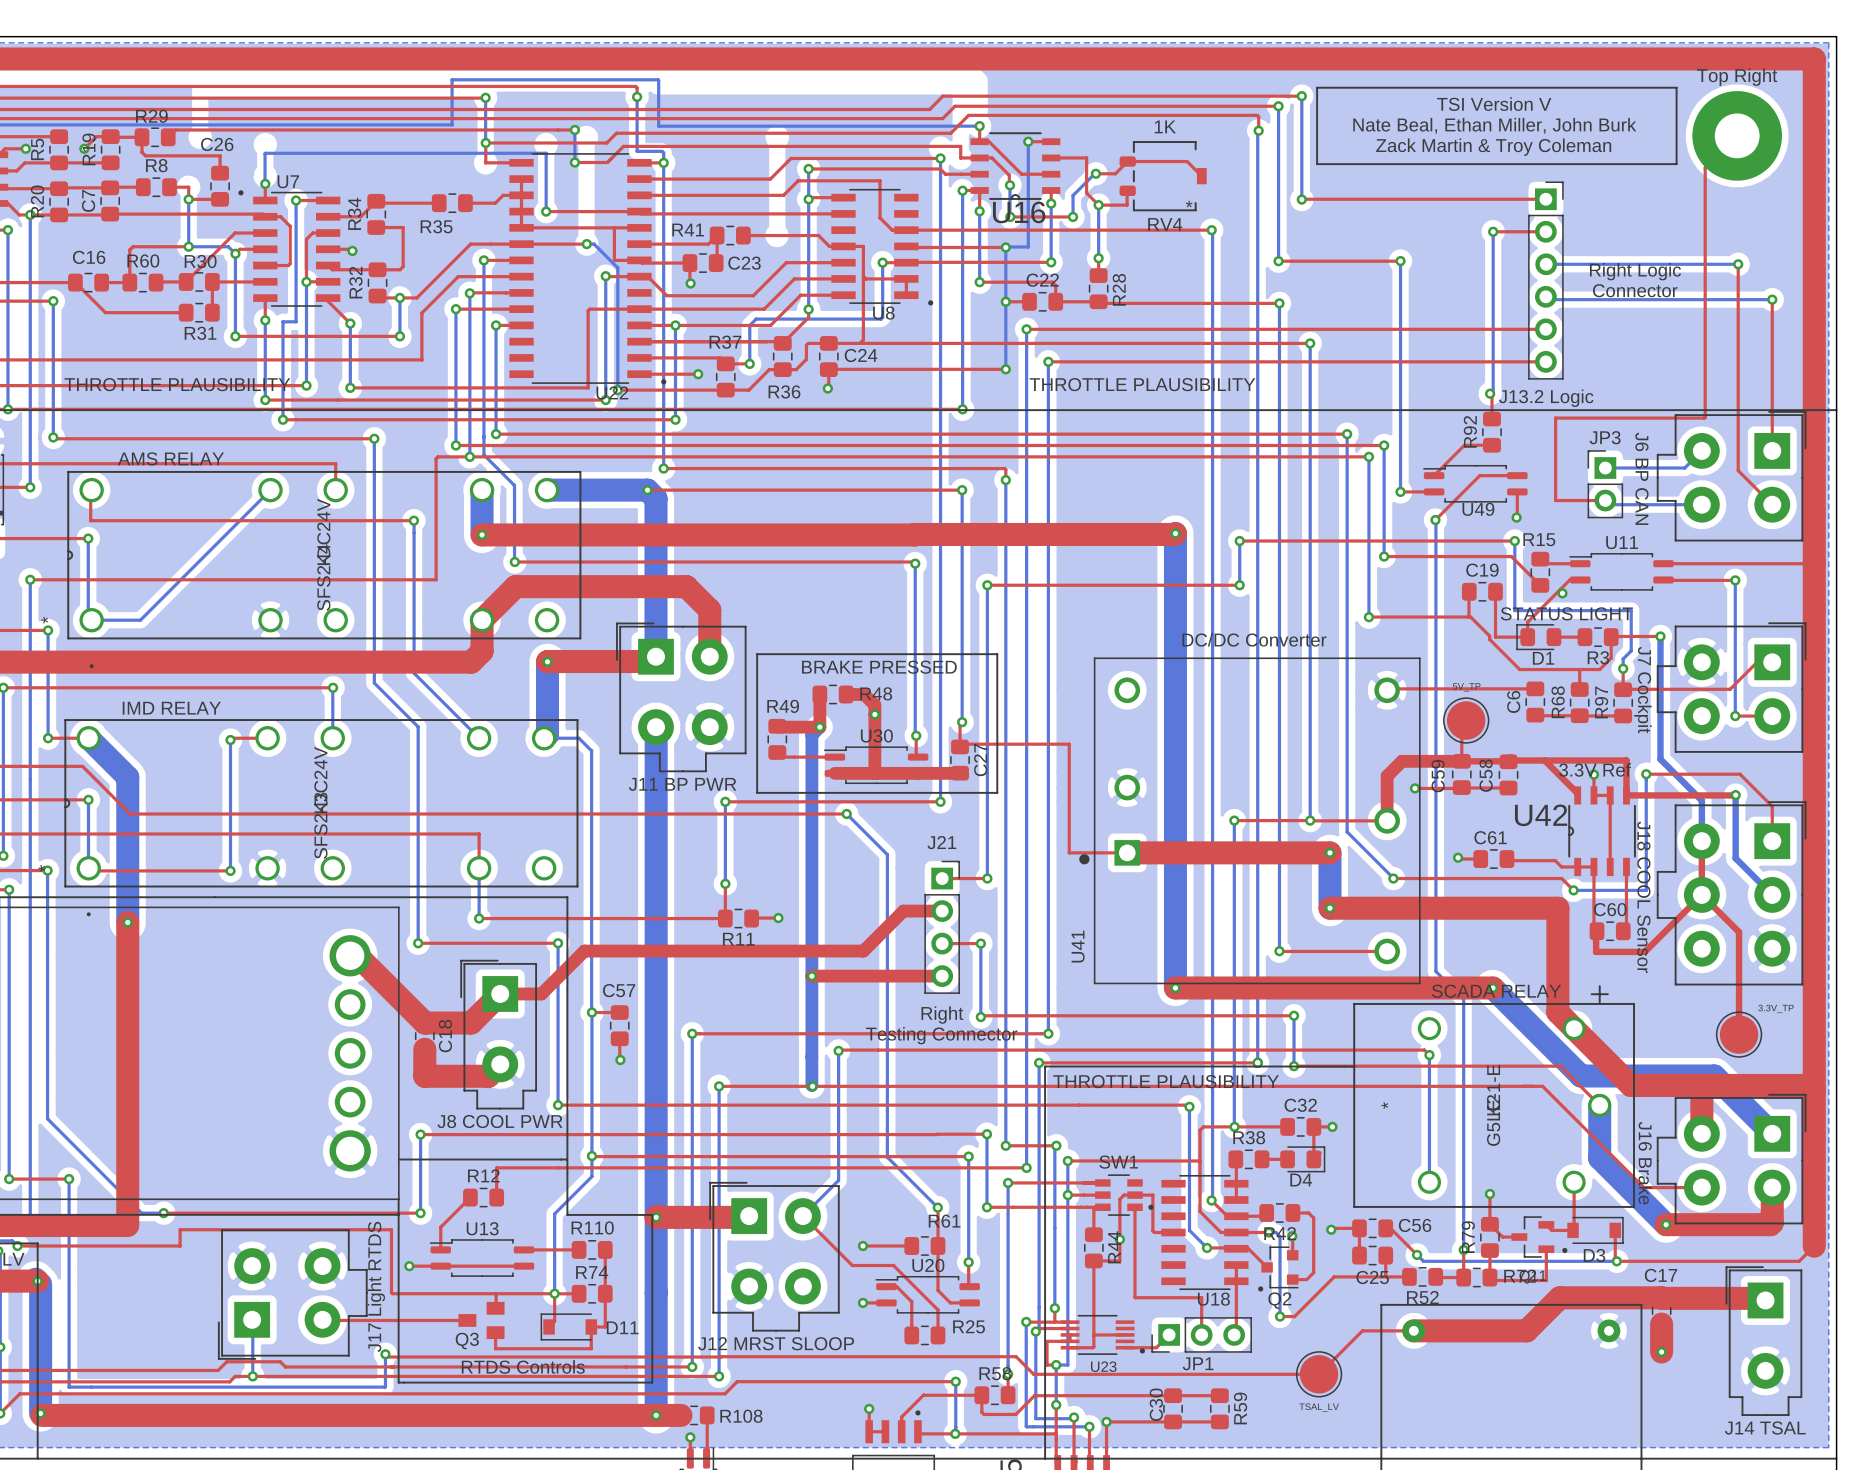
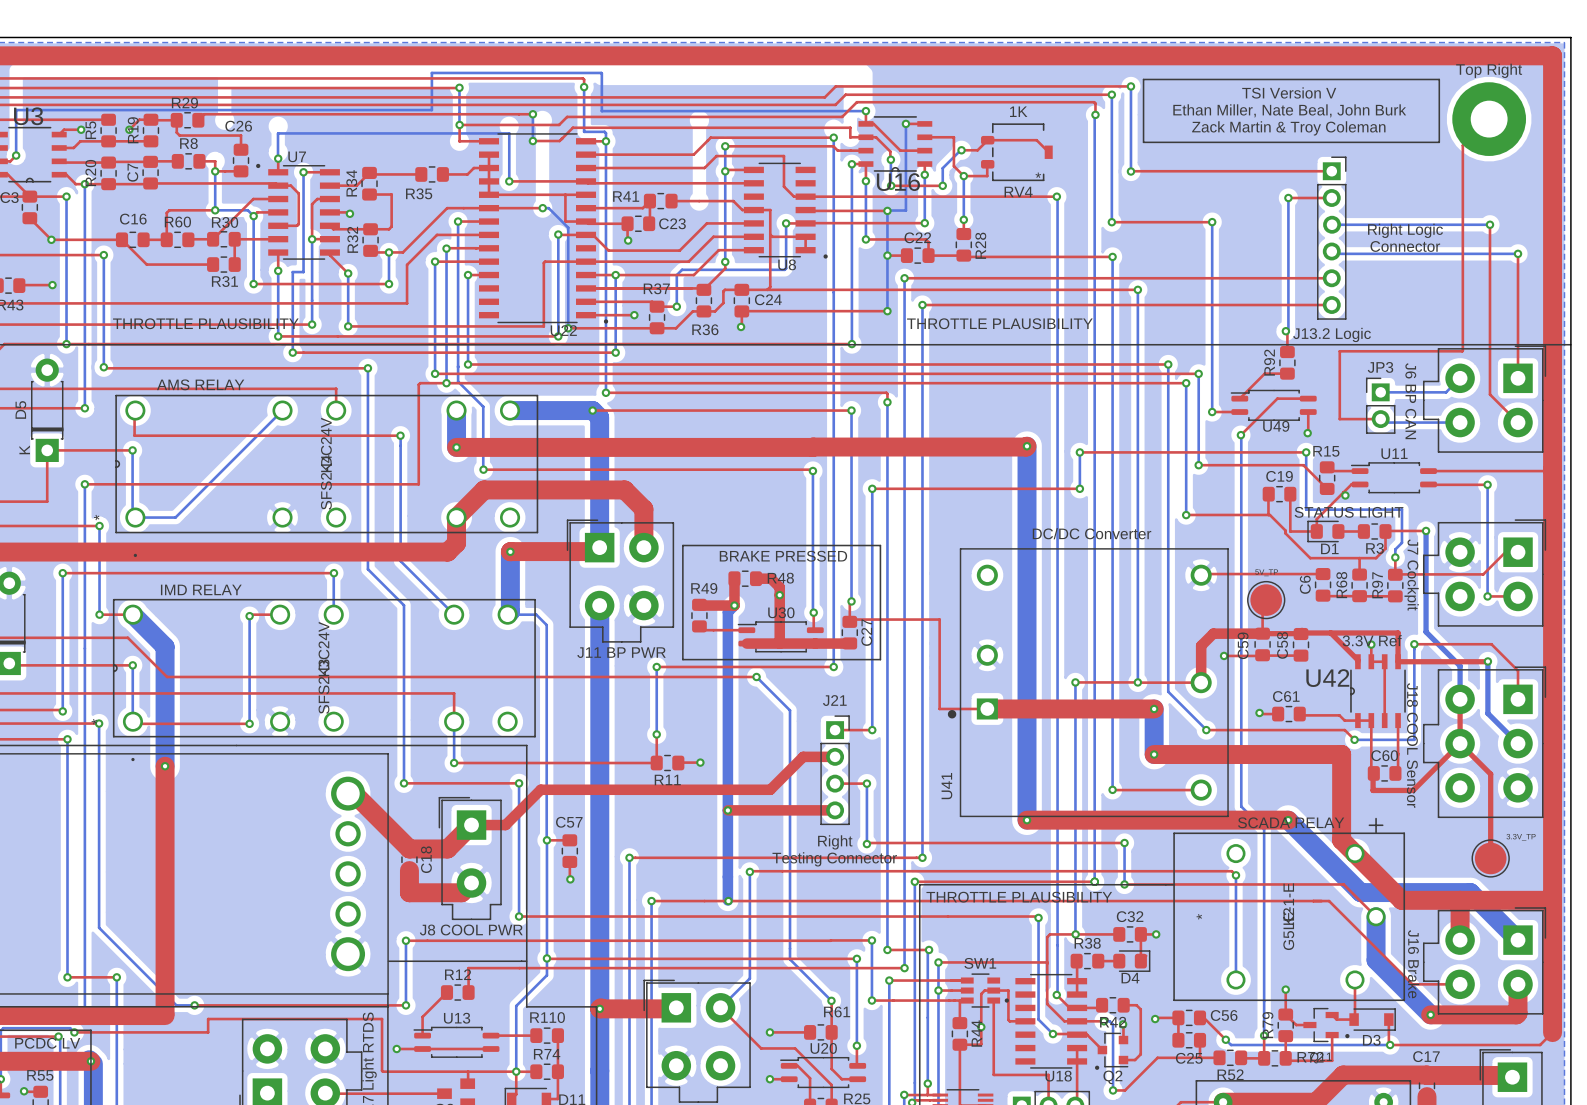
text: Nate Beal, Ethan Miller, John Burk (1494, 125) -> Ethan Miller, Nate Beal, John Burk (1289, 110)

